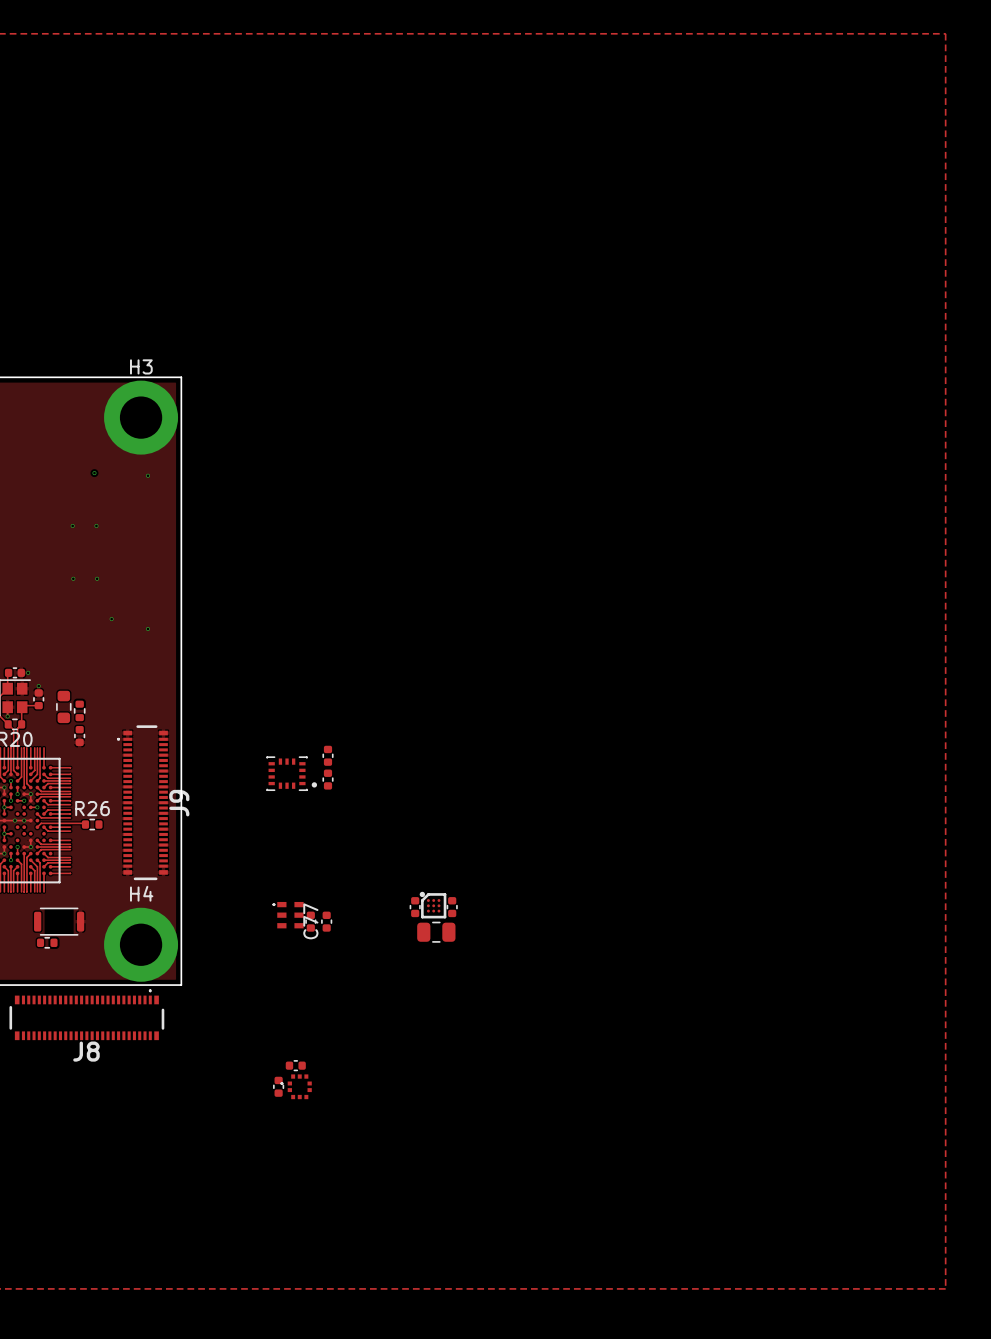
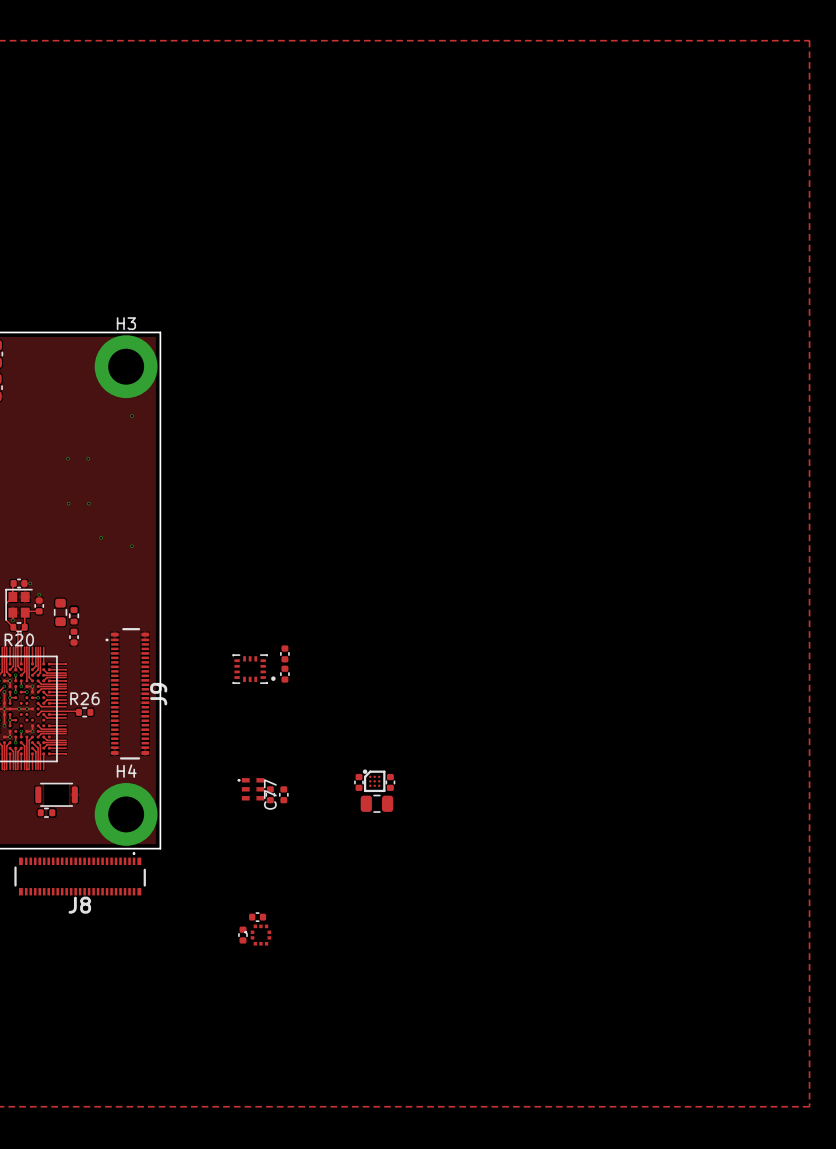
via: (94, 473) -> none

